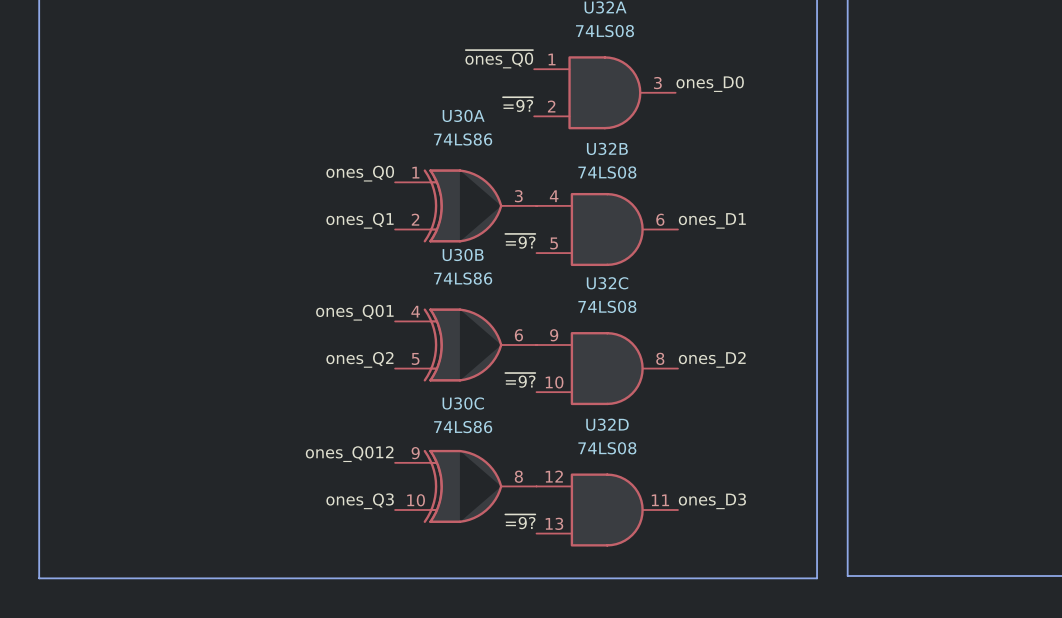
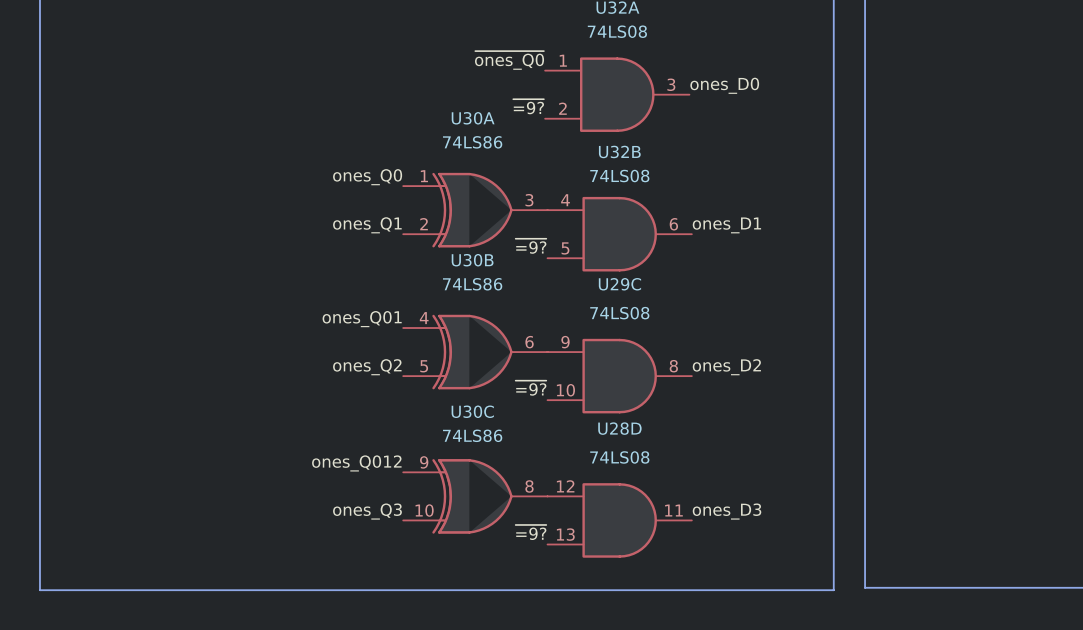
U32C name: U32C (607, 283) -> U29C (619, 284)
U32D name: U32D (607, 424) -> U28D (619, 428)

